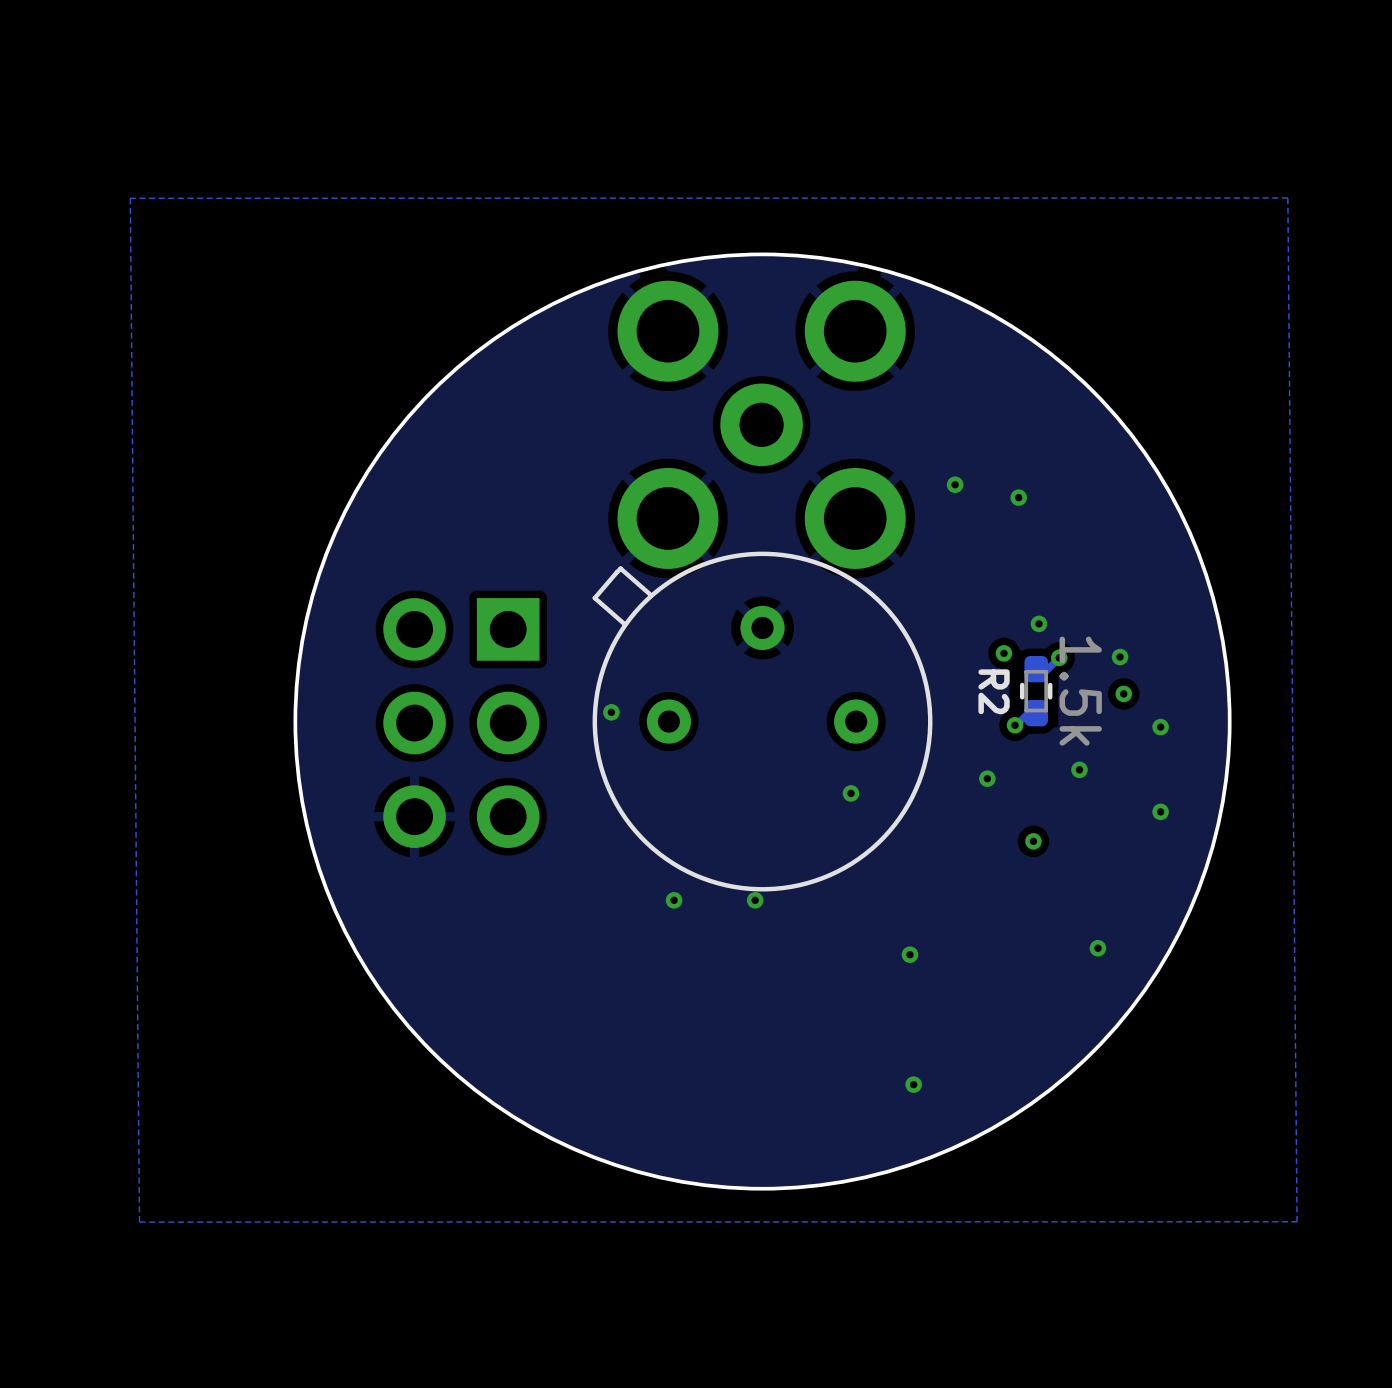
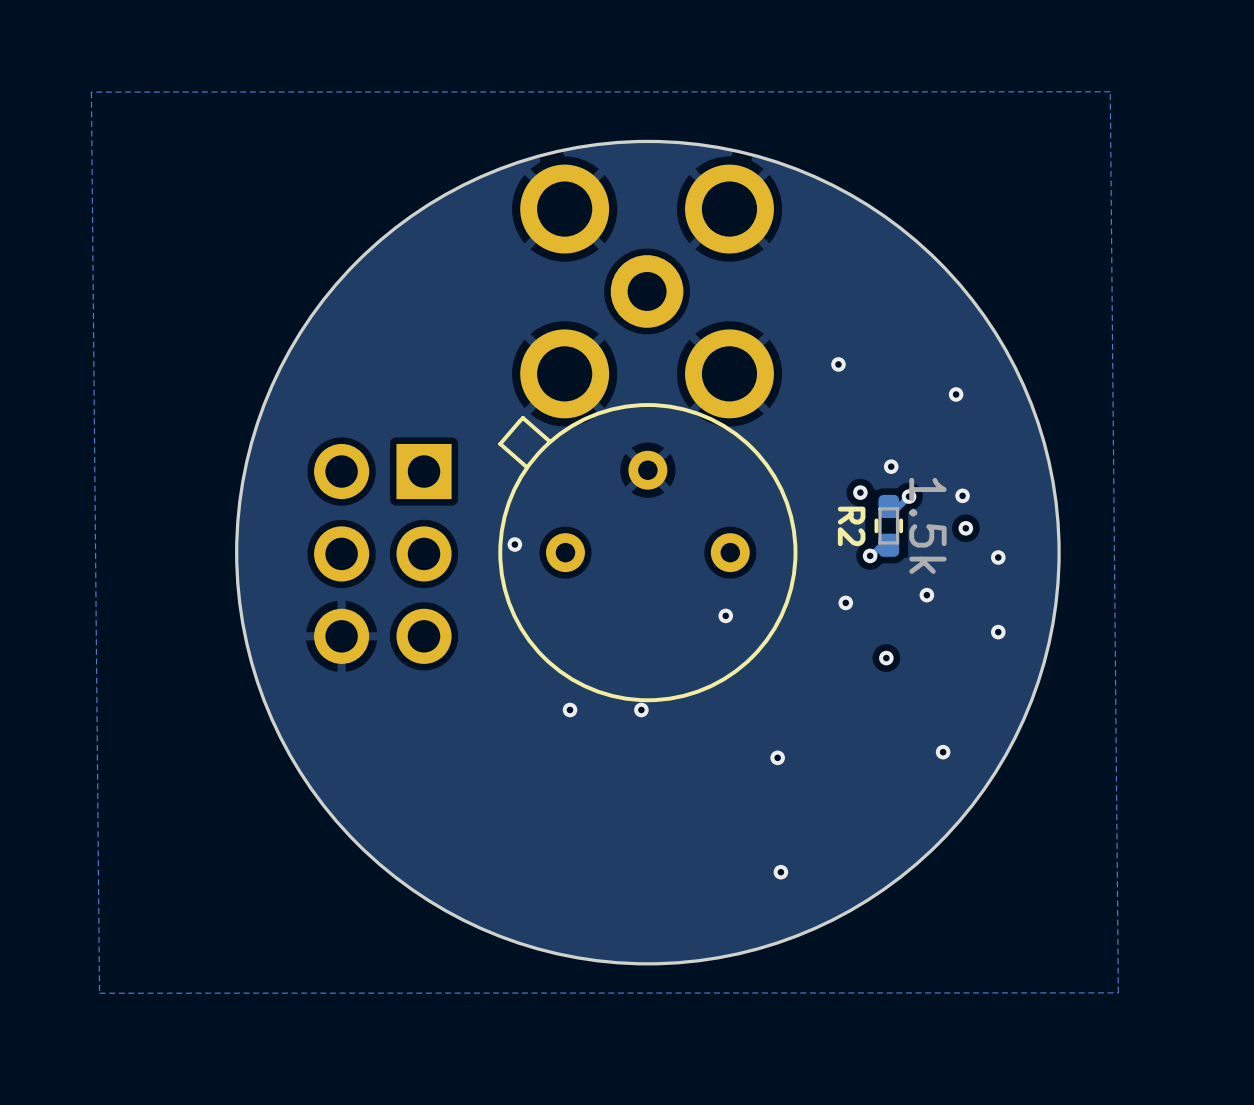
via: (955, 484) -> none
via: (1018, 497) -> none
via: none -> (838, 364)
via: none -> (956, 394)

